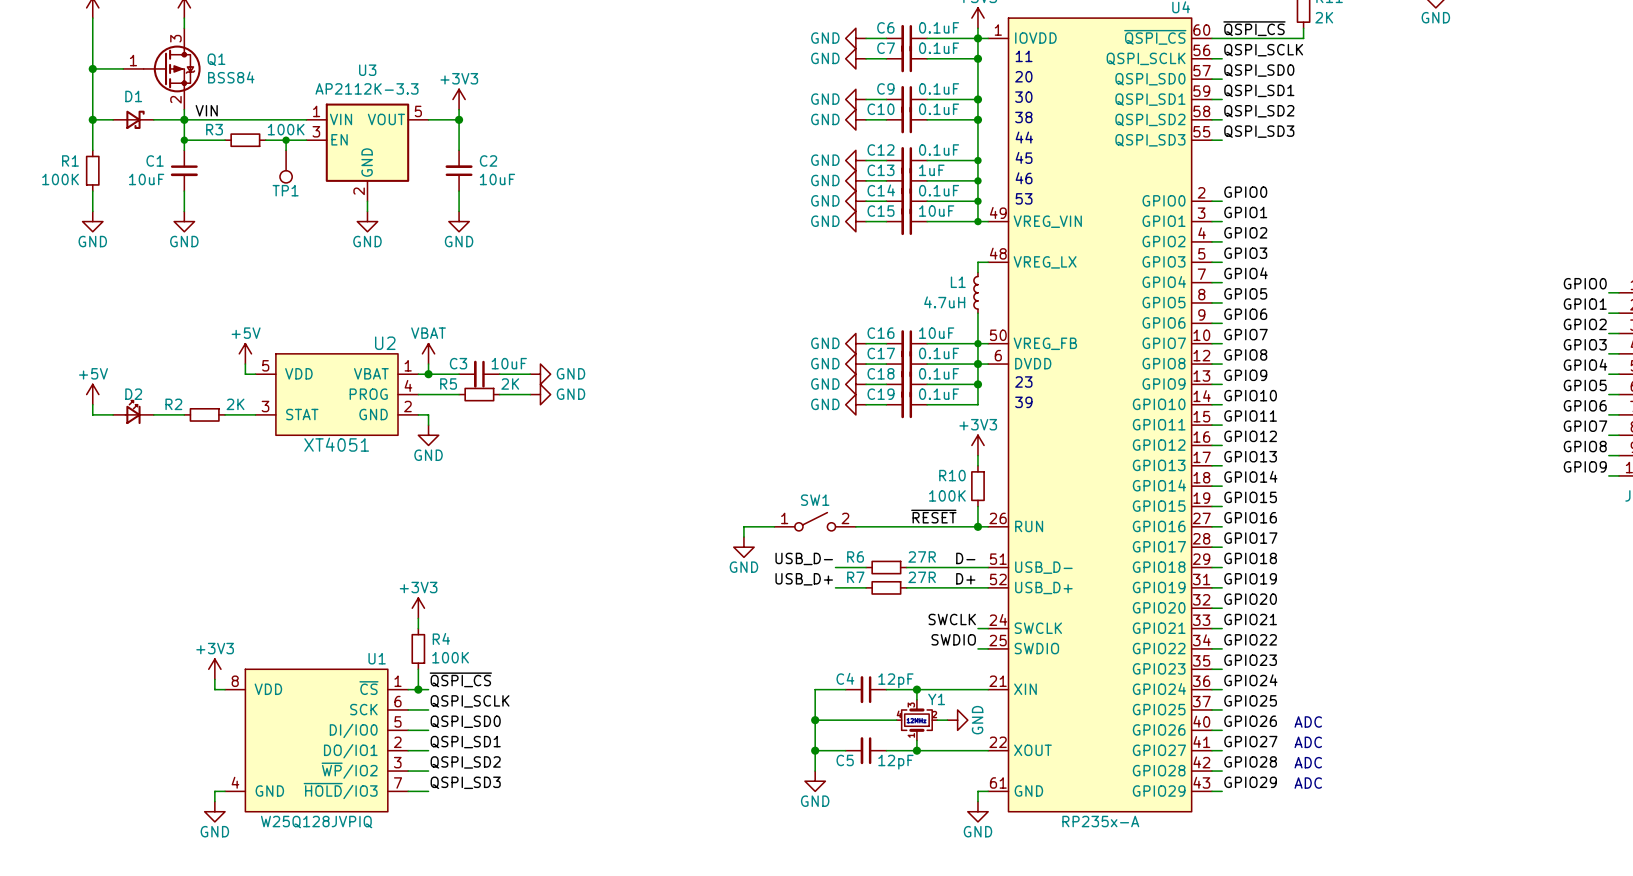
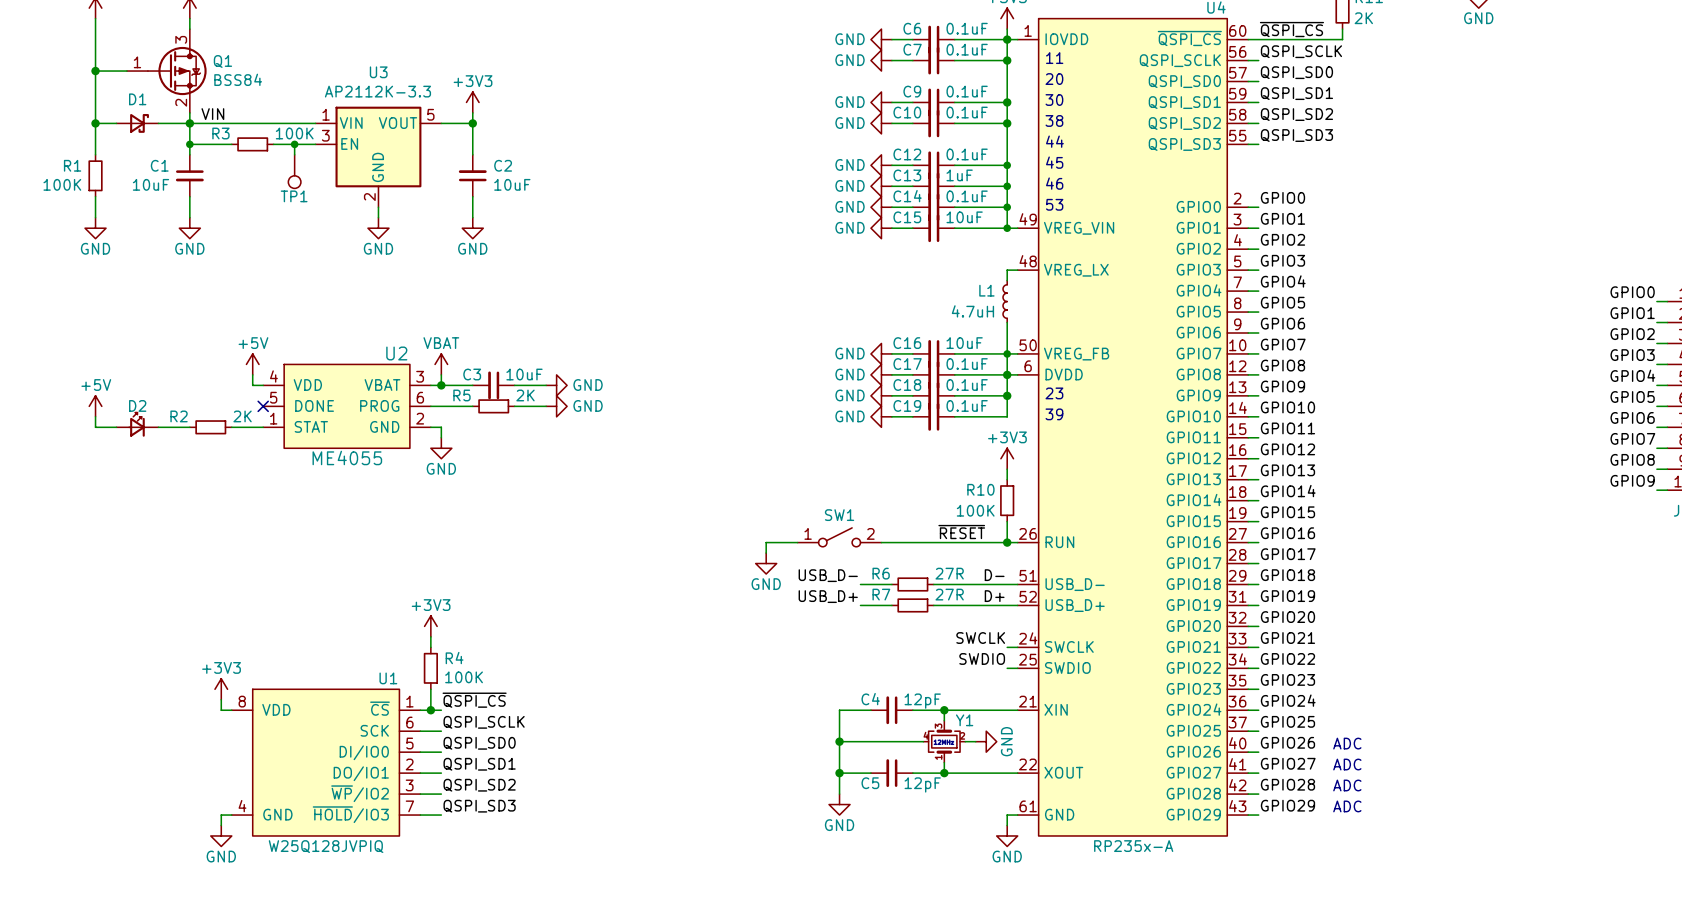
U2 symbol: [255, 353, 419, 436] -> [263, 364, 431, 449]
no-connect mark: none -> (263, 406)
U2 value: XT4051 (336, 444) -> ME4055 (347, 457)

